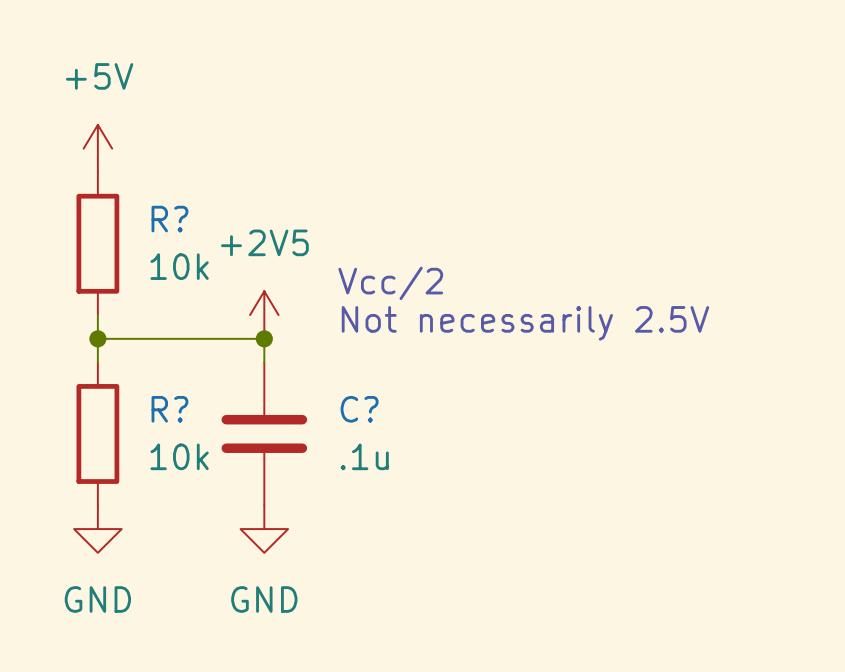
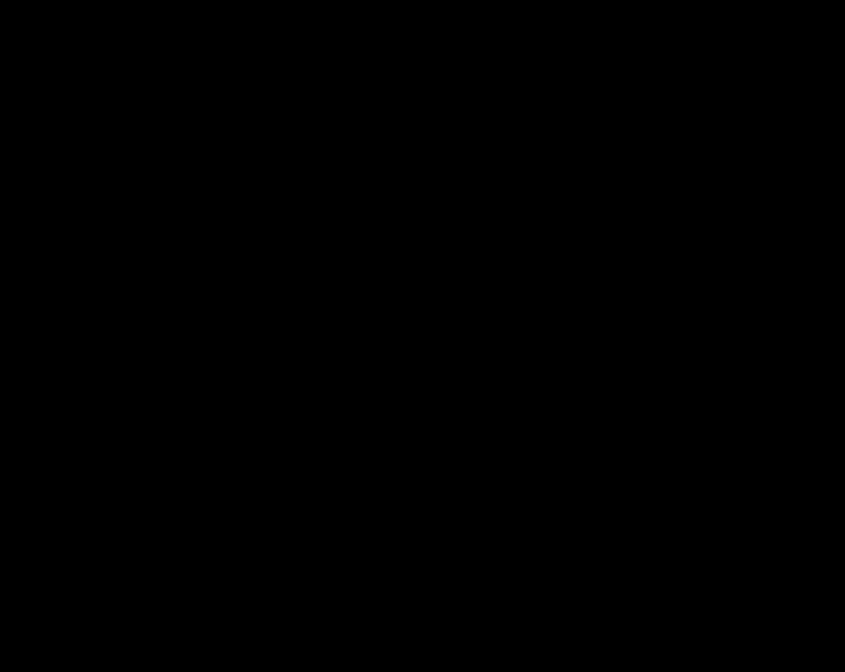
power symbol: +5V (97, 148) -> none
R?: 10k (97, 243) -> none
text: Vcc/2 (390, 283) -> none
wire: (97, 315) (97, 362) -> none
power symbol: +2V5 (264, 315) -> none
text: Not necessarily 2.5V (525, 323) -> none
wire: (97, 338) (264, 338) (264, 362) -> none
junction: (97, 338) -> none
junction: (264, 338) -> none
R?: 10k (97, 433) -> none
C?: .1u (264, 433) -> none
power symbol: GND (97, 529) -> none
power symbol: GND (264, 529) -> none

